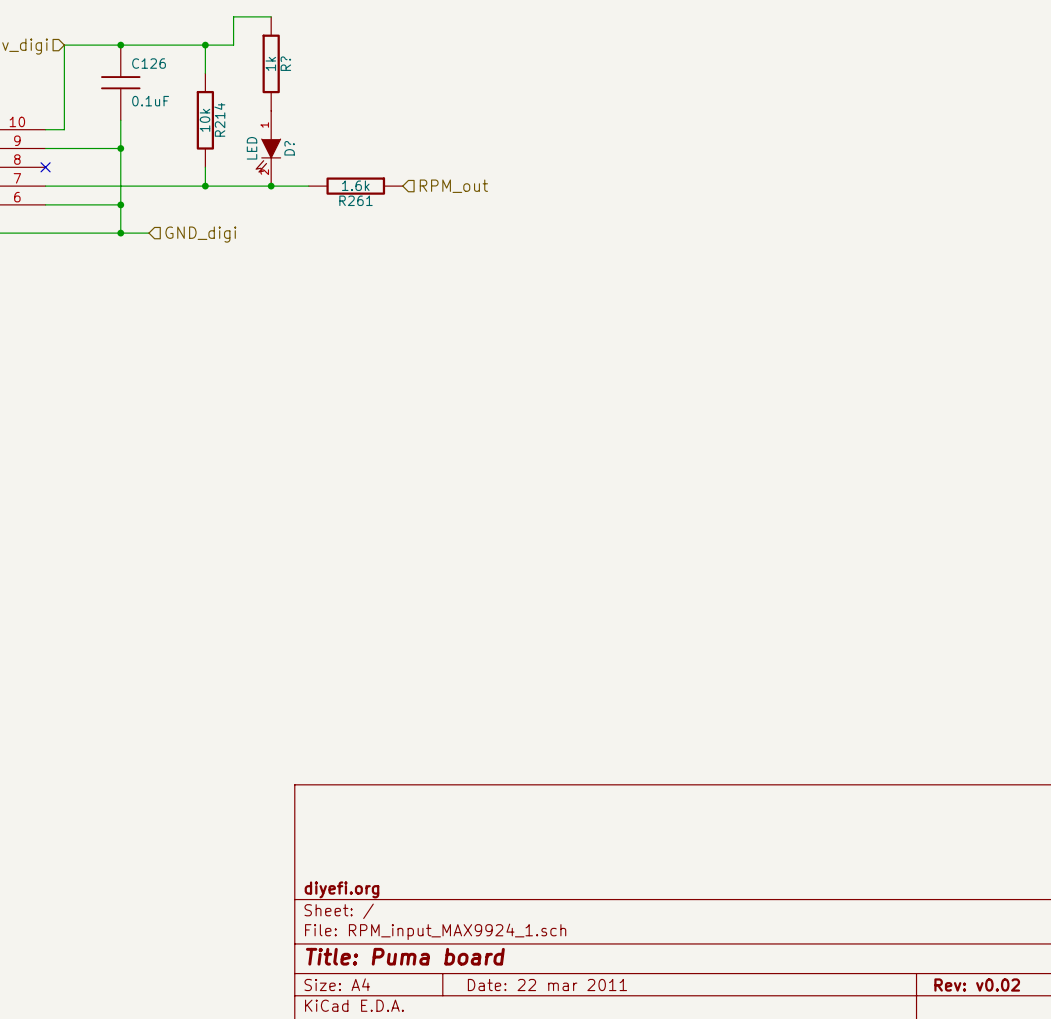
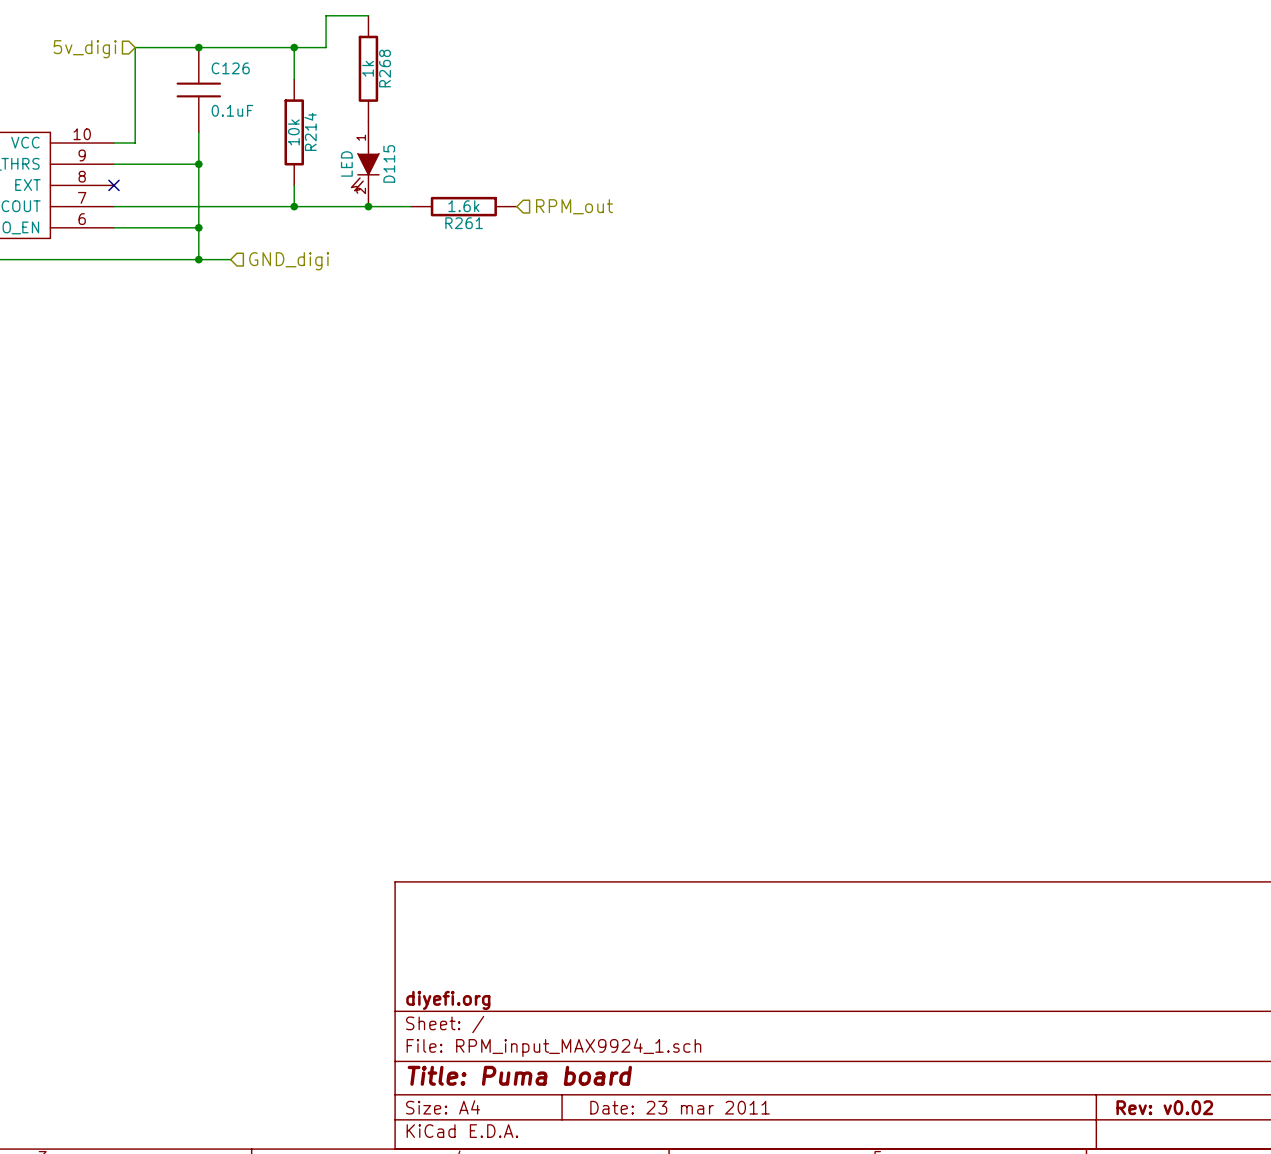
R? name: R? (285, 63) -> R268 (385, 68)
D? name: D? (289, 148) -> D115 (389, 163)
title block: Date: 22 mar 2011 (547, 985) -> Date: 23 mar 2011 (680, 1107)

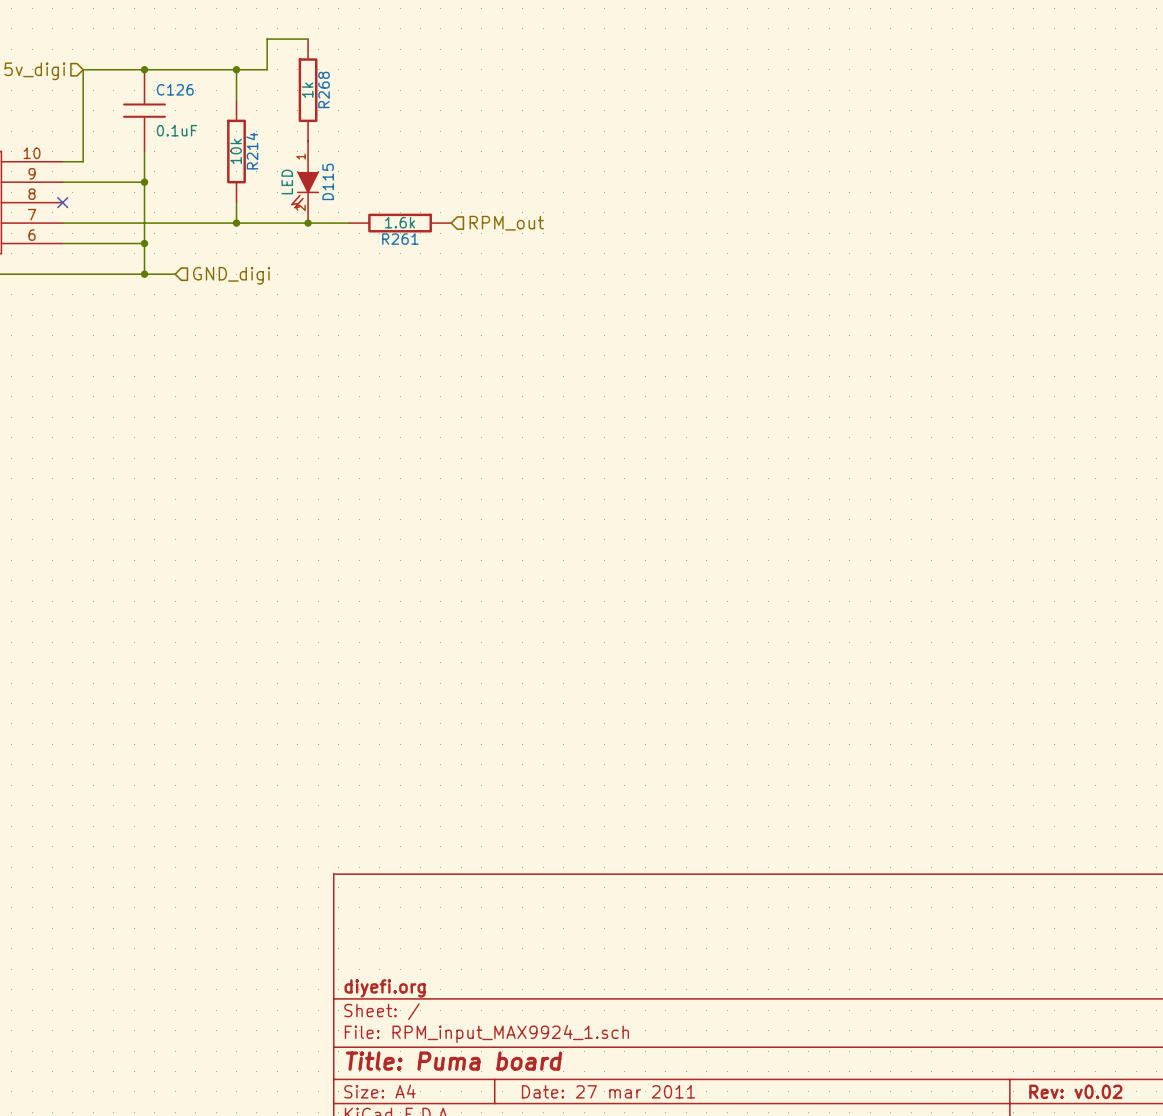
title block: Date: 23 mar 2011 (680, 1107) -> Date: 27 mar 2011 (608, 1091)

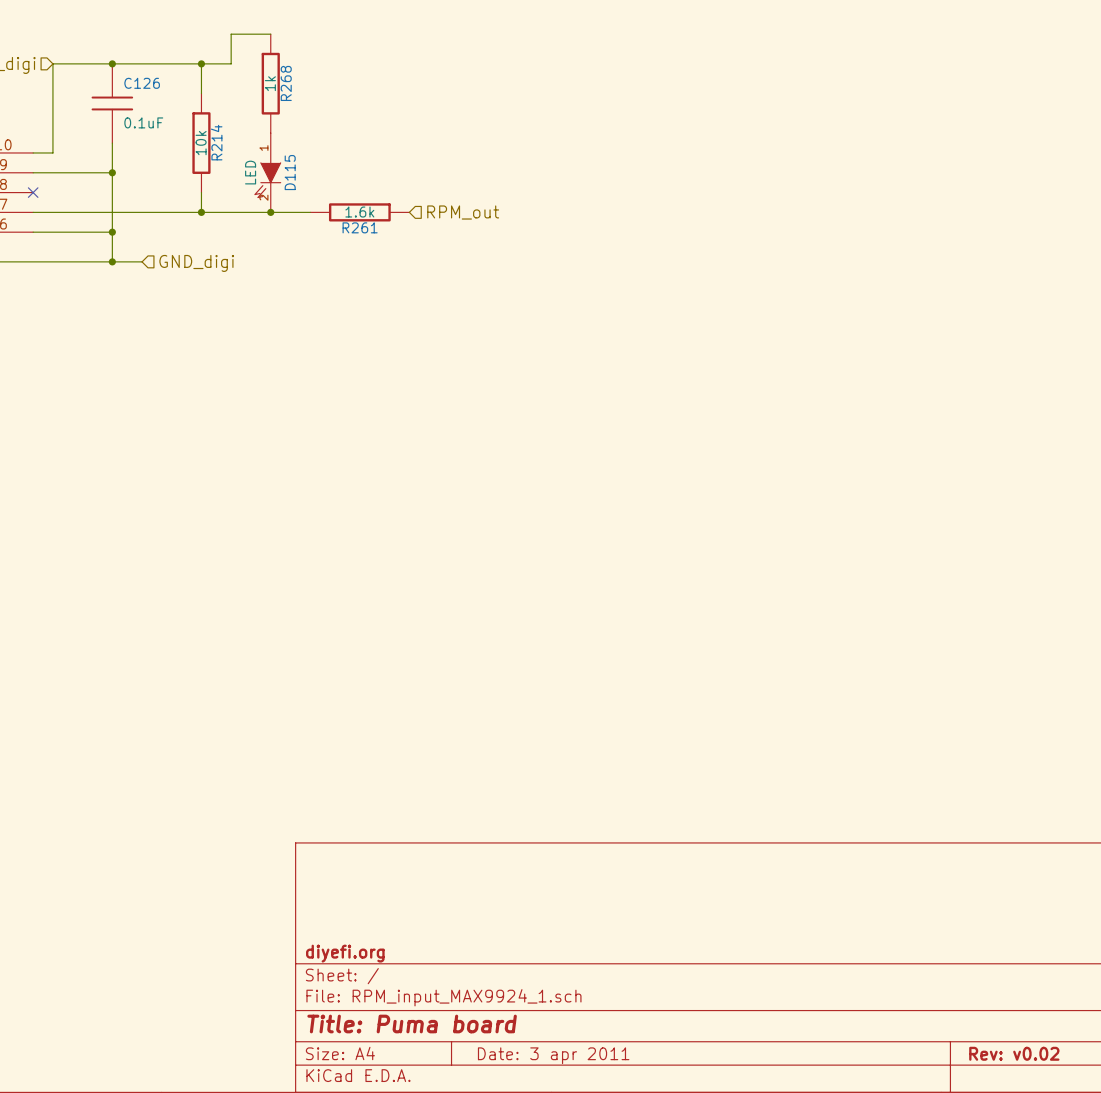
title block: Date: 27 mar 2011 (608, 1091) -> Date: 3 apr 2011 (553, 1055)

